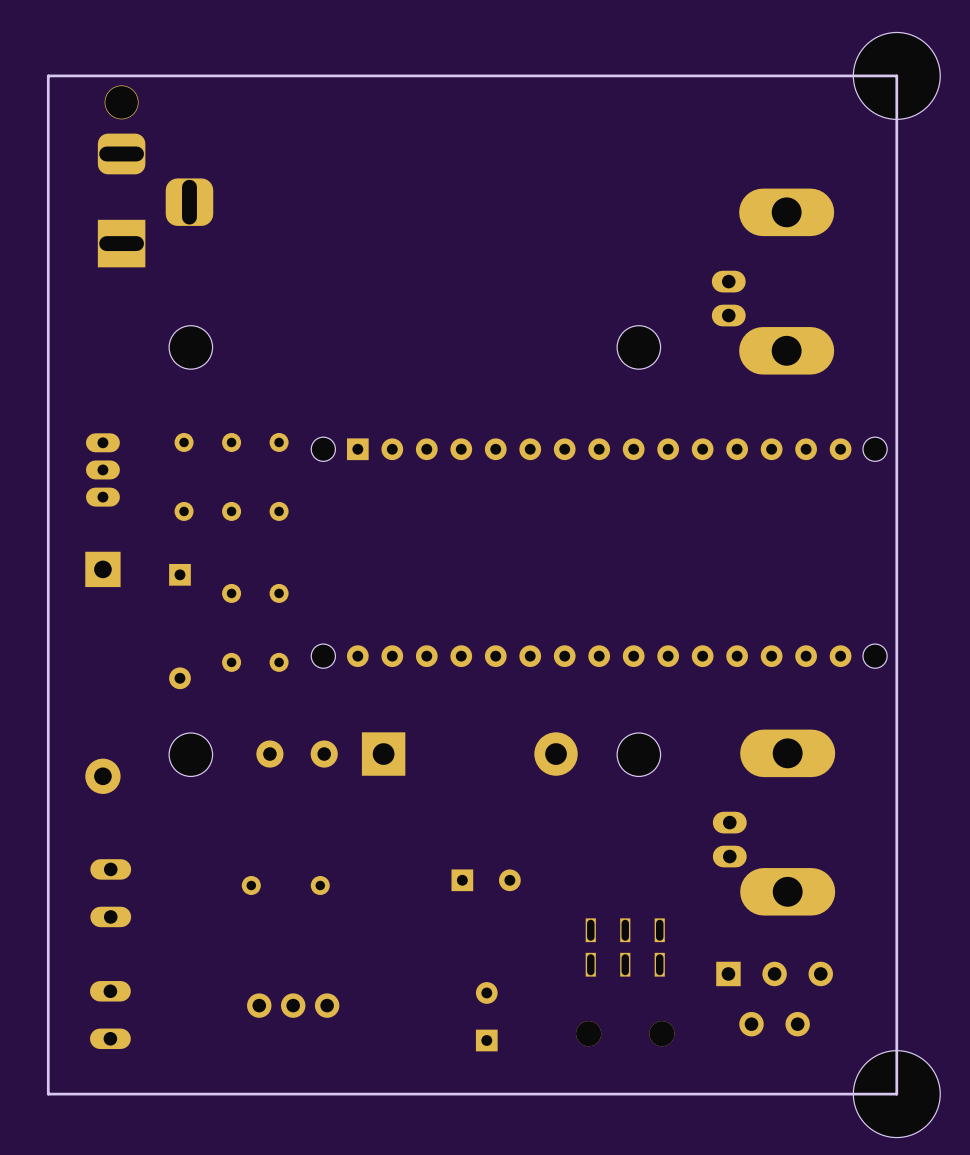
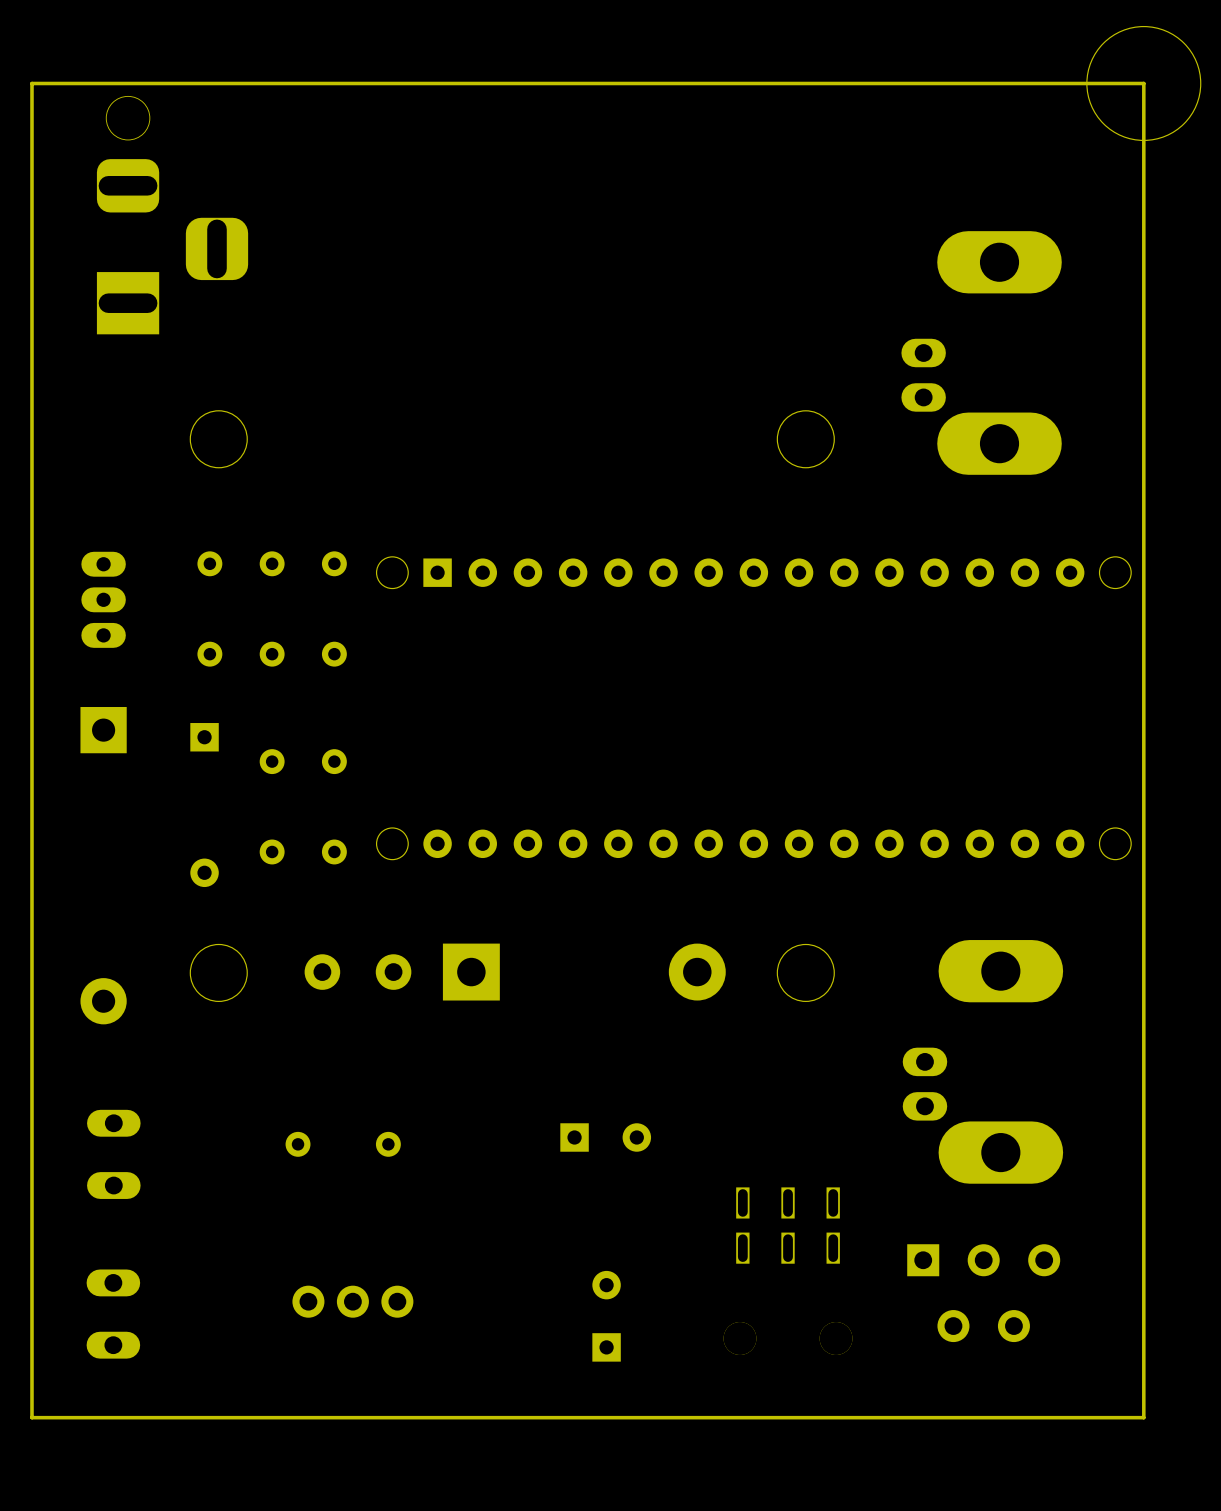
part: (896, 1094) -> none

